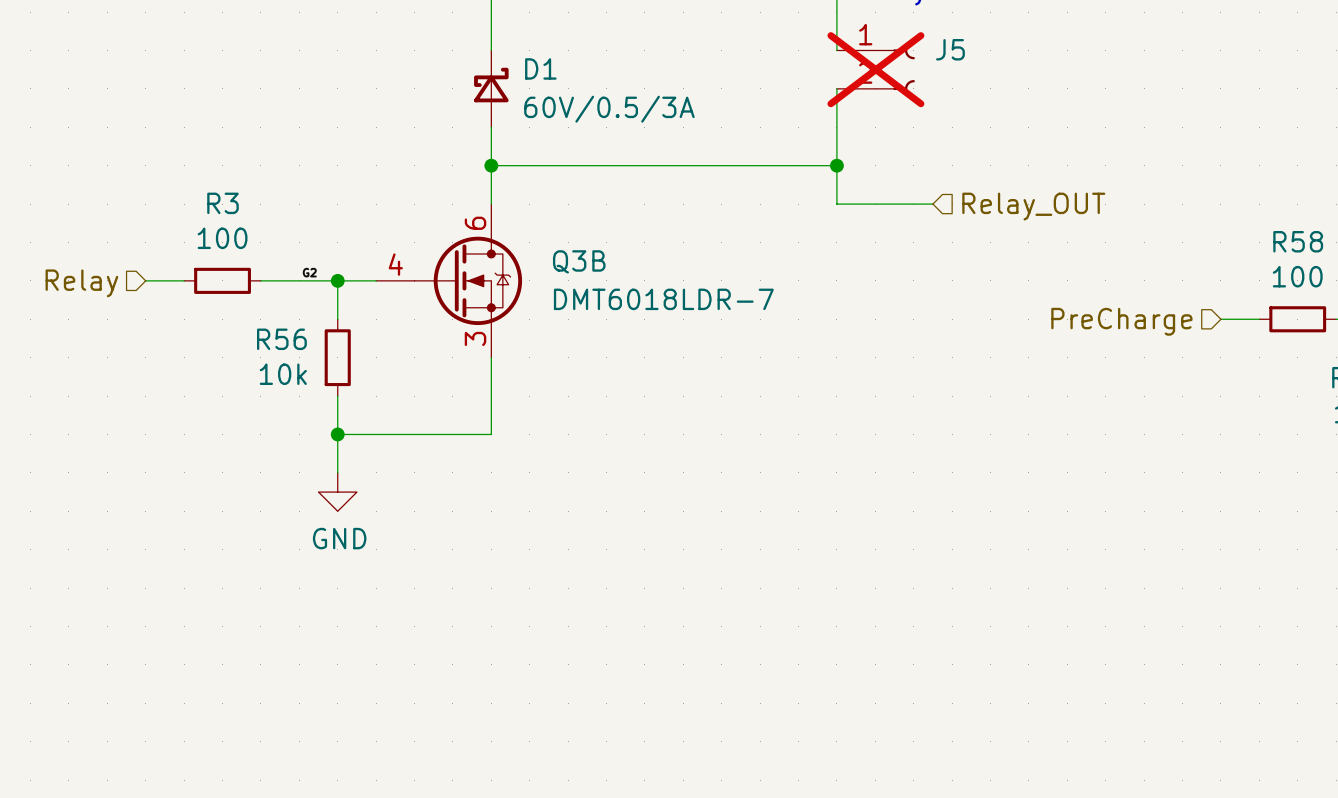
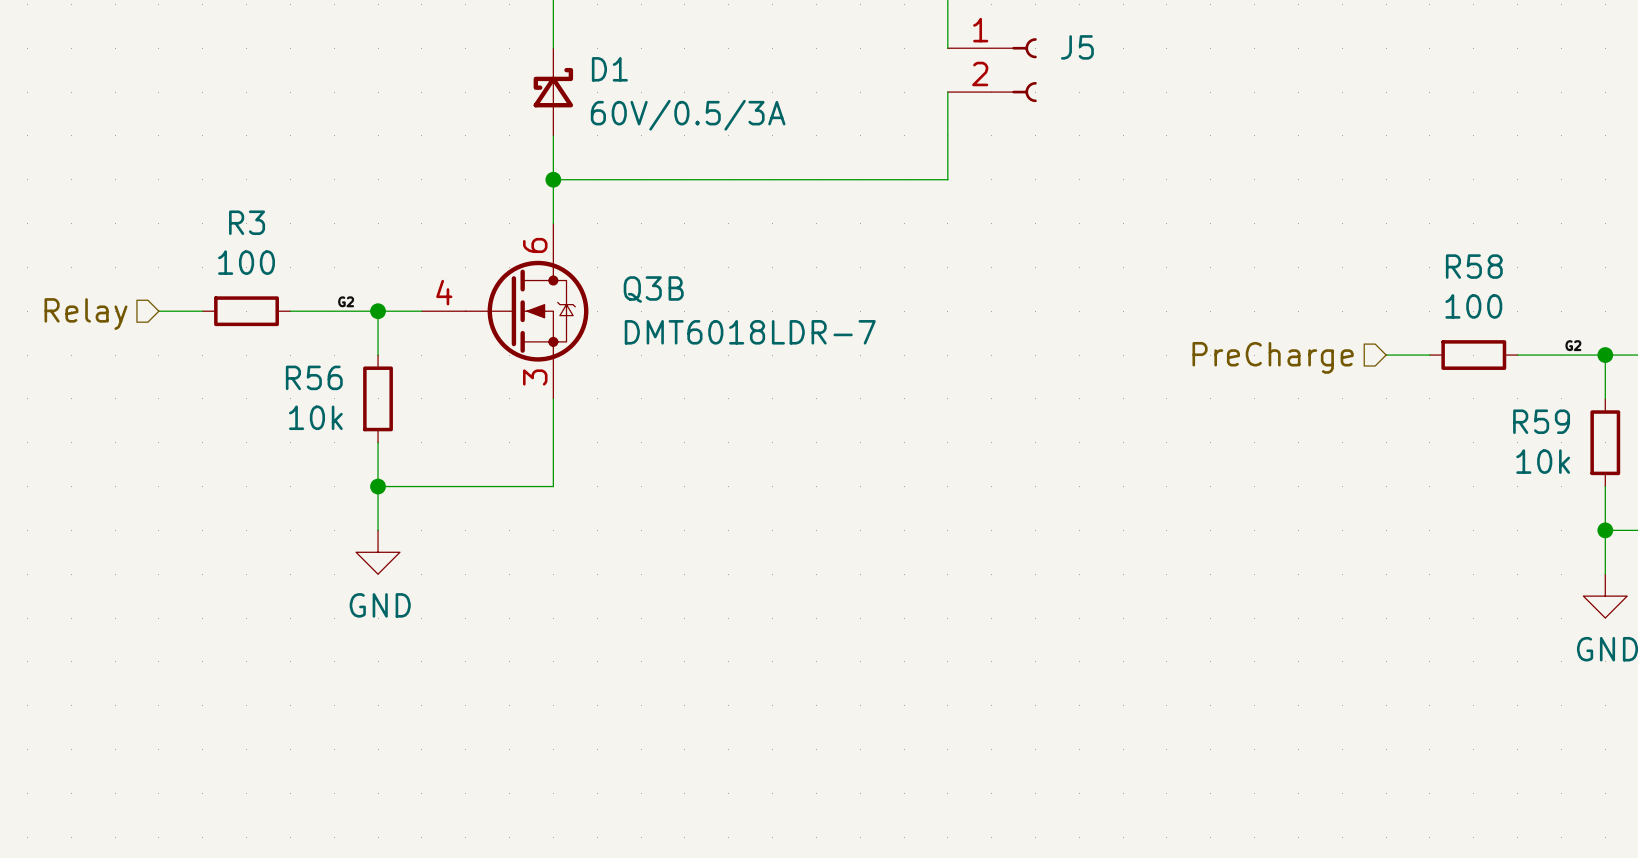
J5 do-not-place cross: (875, 69) -> none
wire: (836, 165) (836, 204) (932, 204) -> none
junction: (836, 165) -> none
hierarchical label: Relay_OUT (1033, 206) -> none

